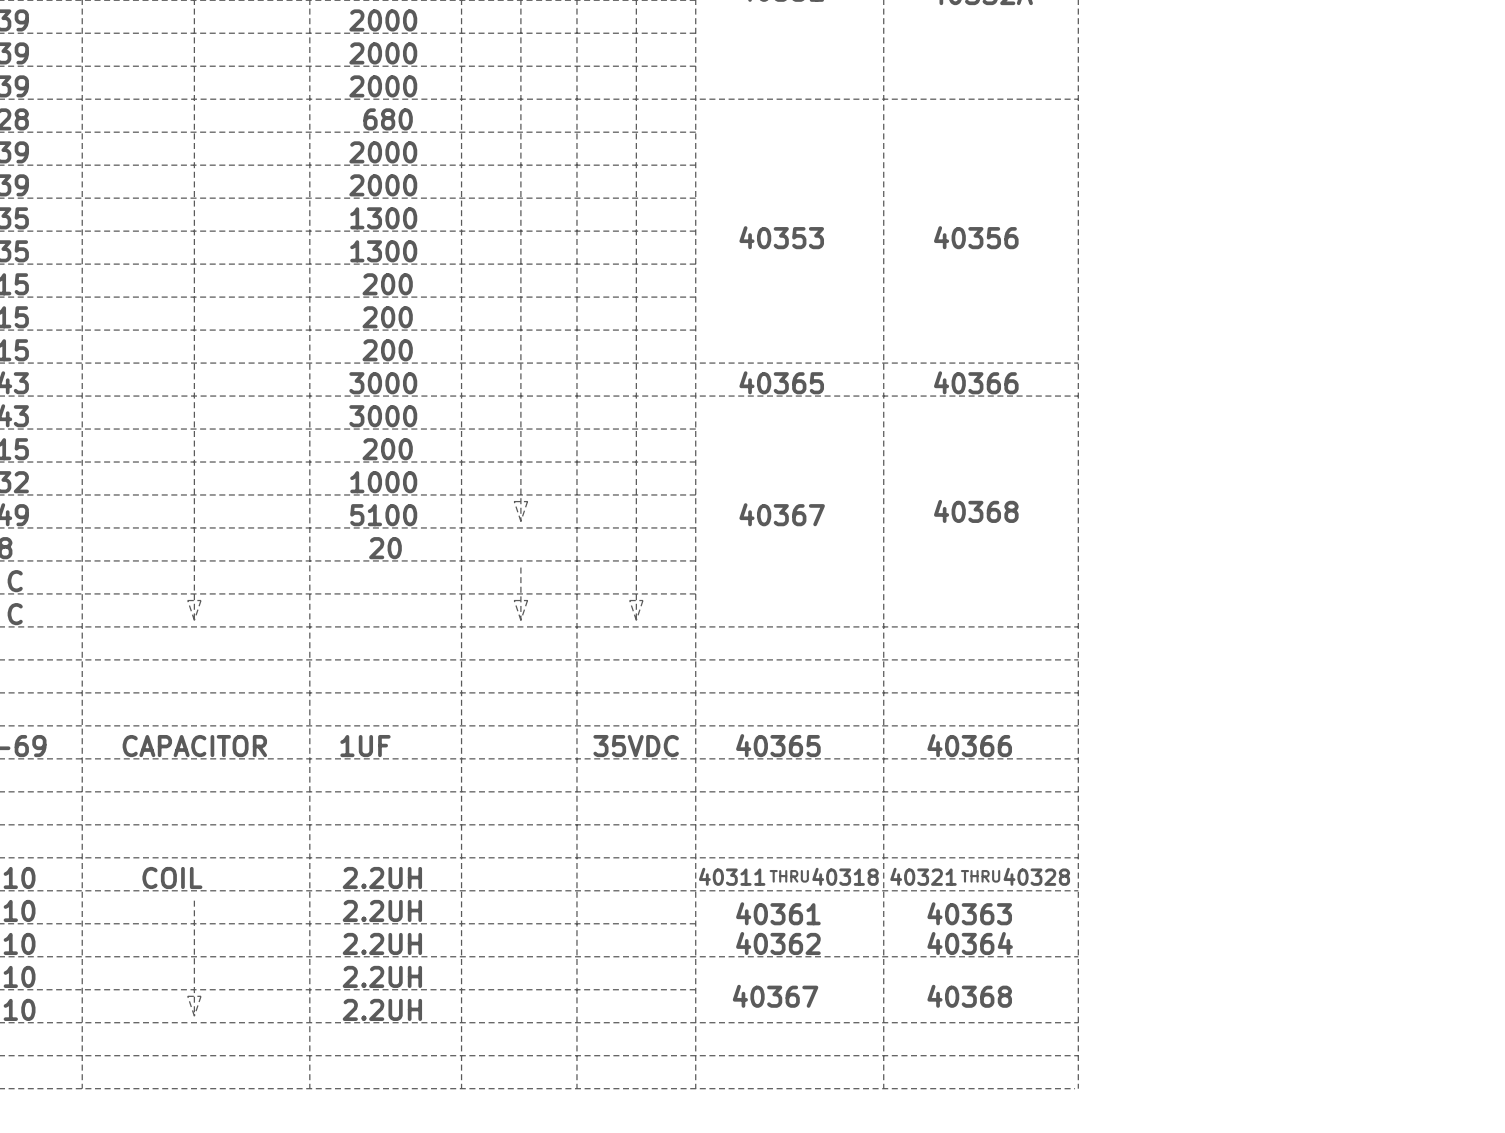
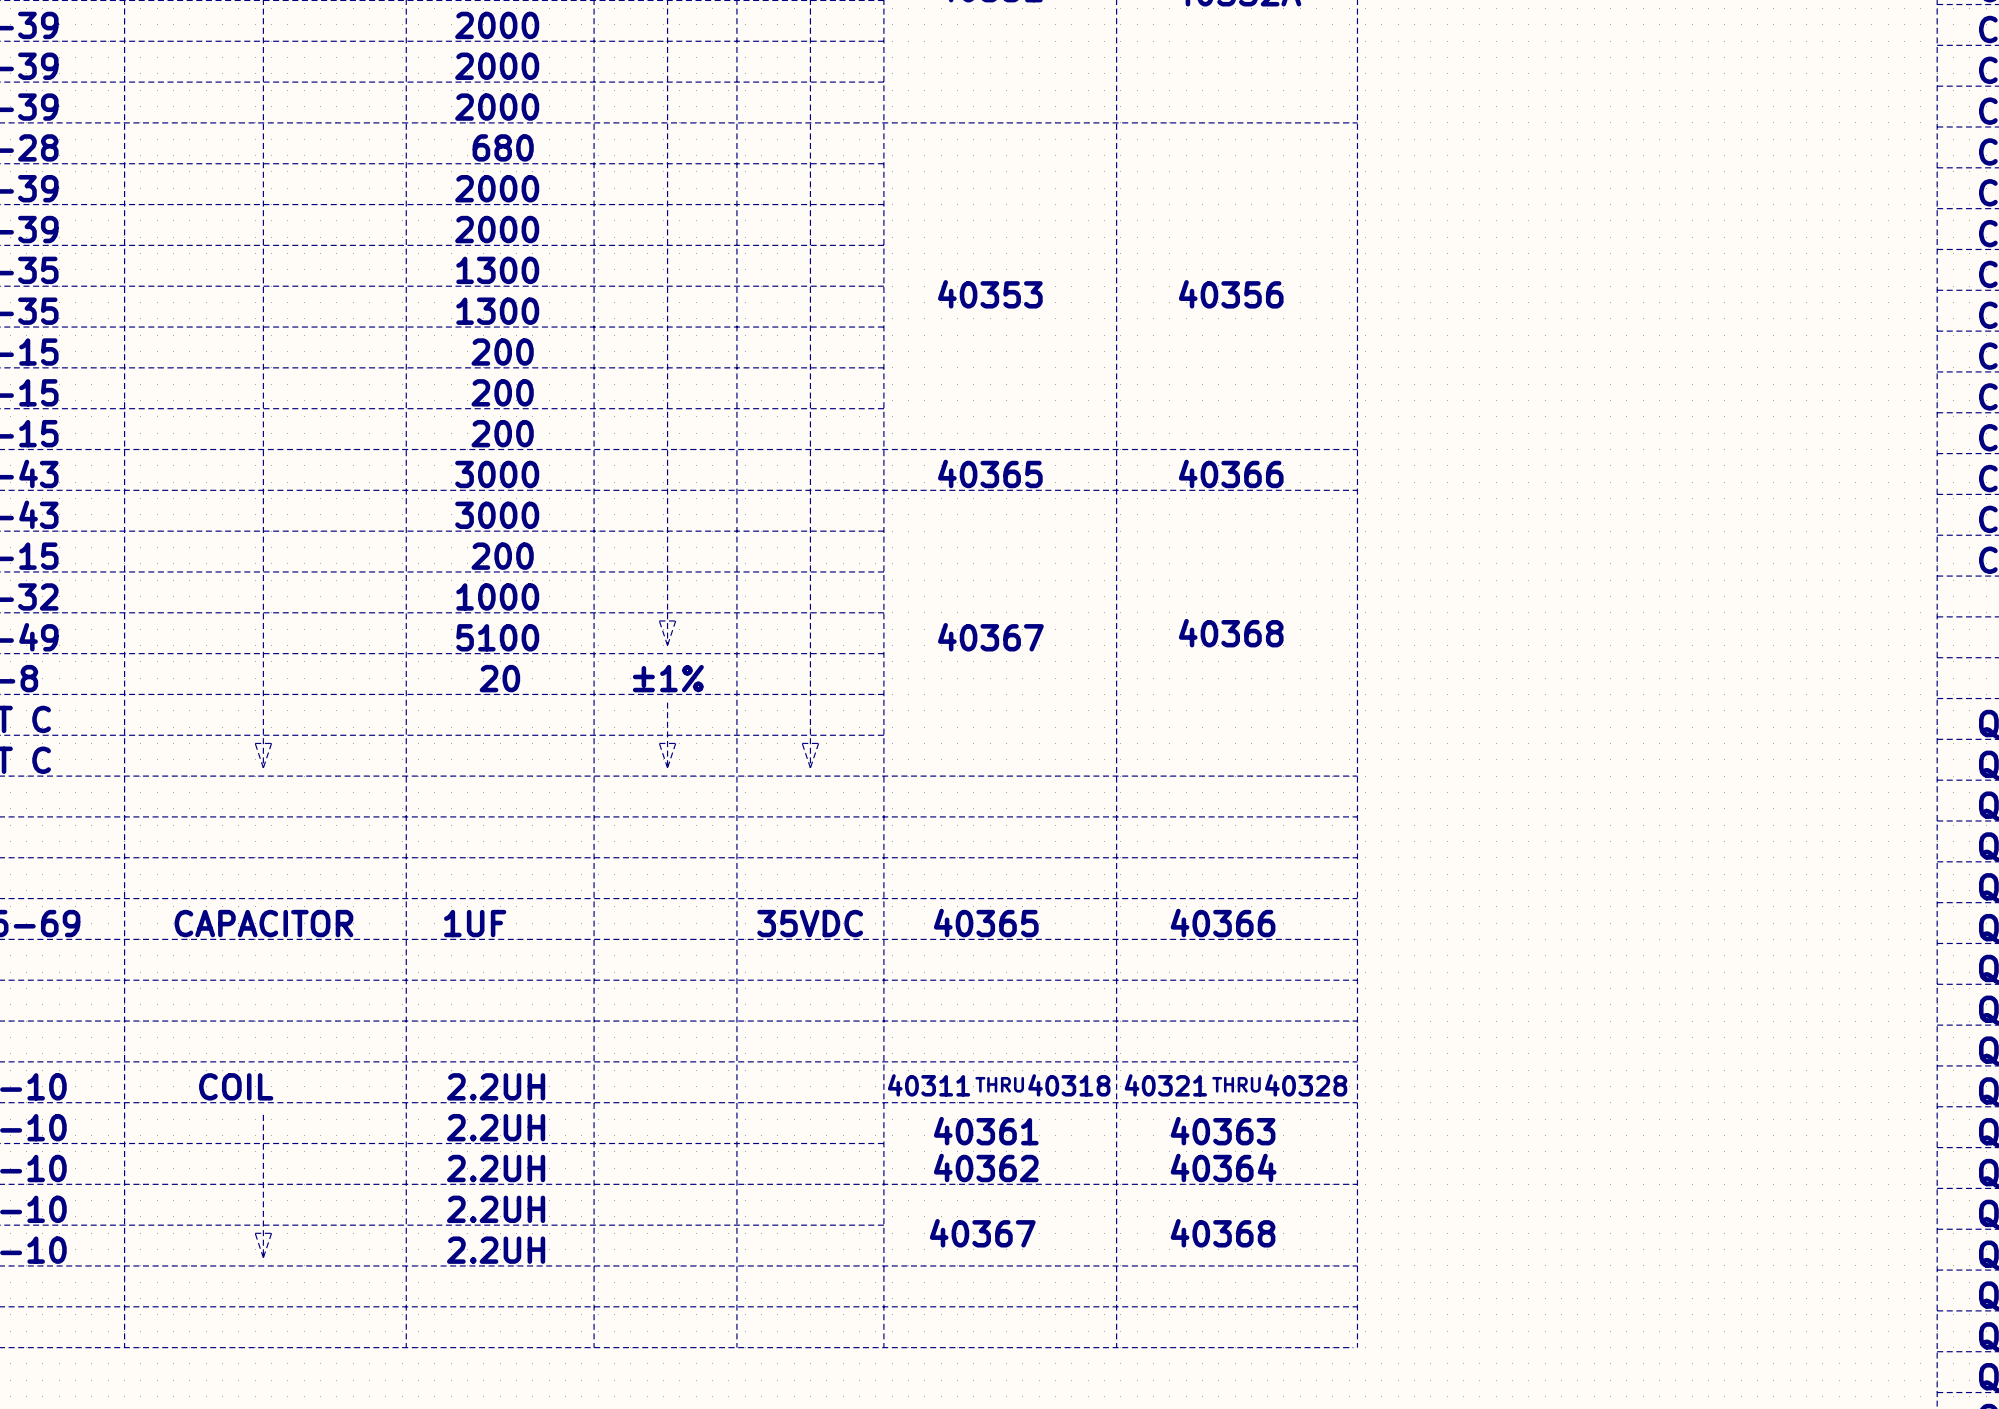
text: none -> ±1% (668, 678)

